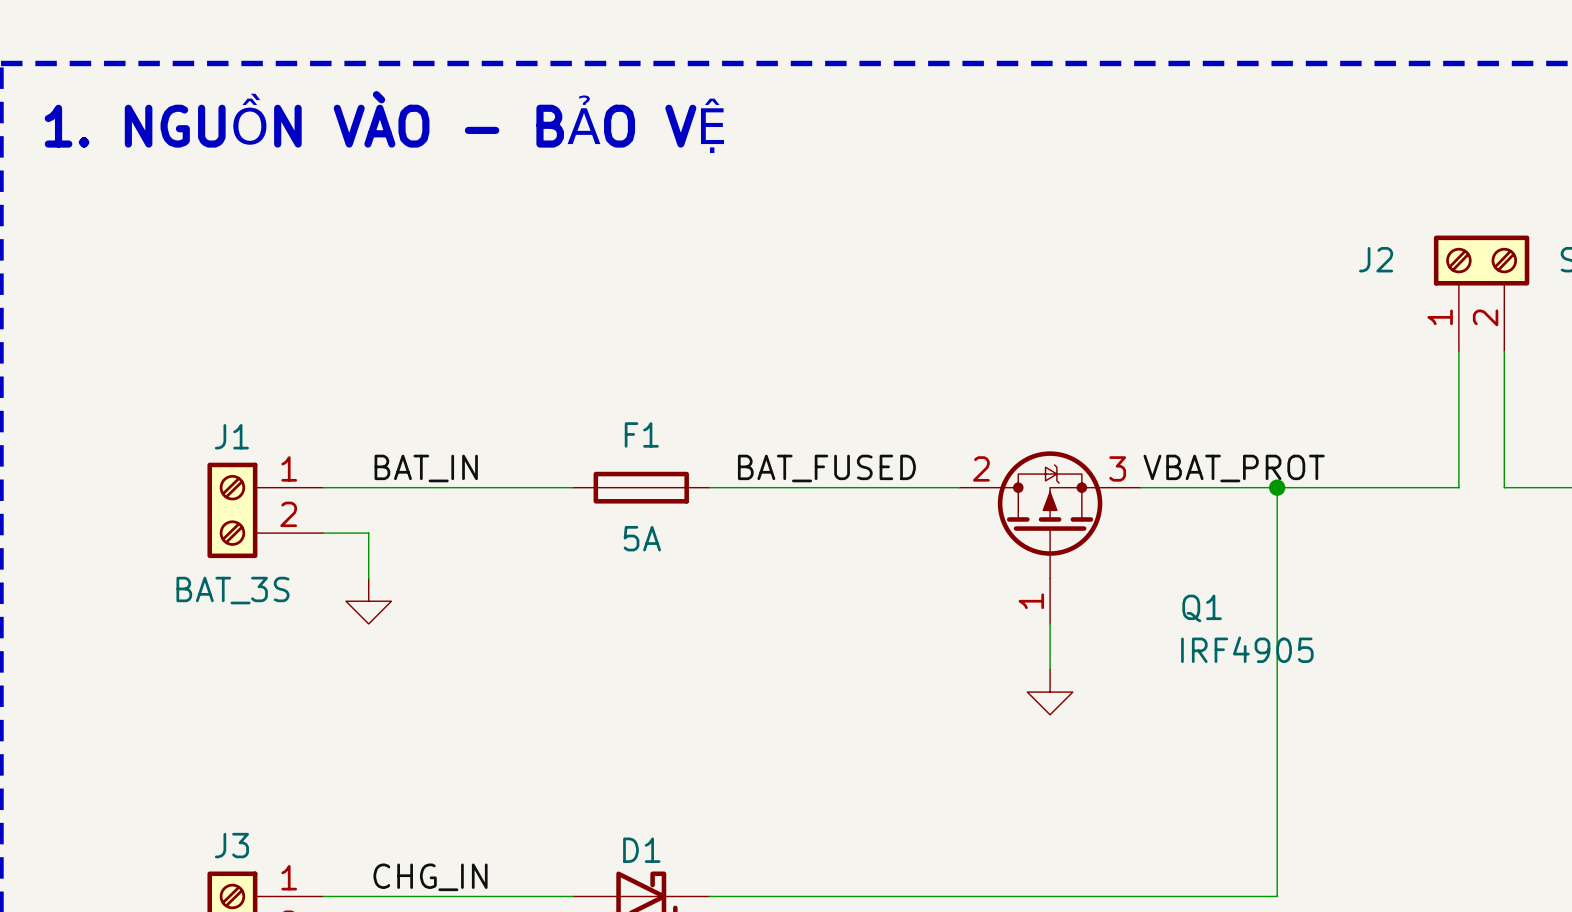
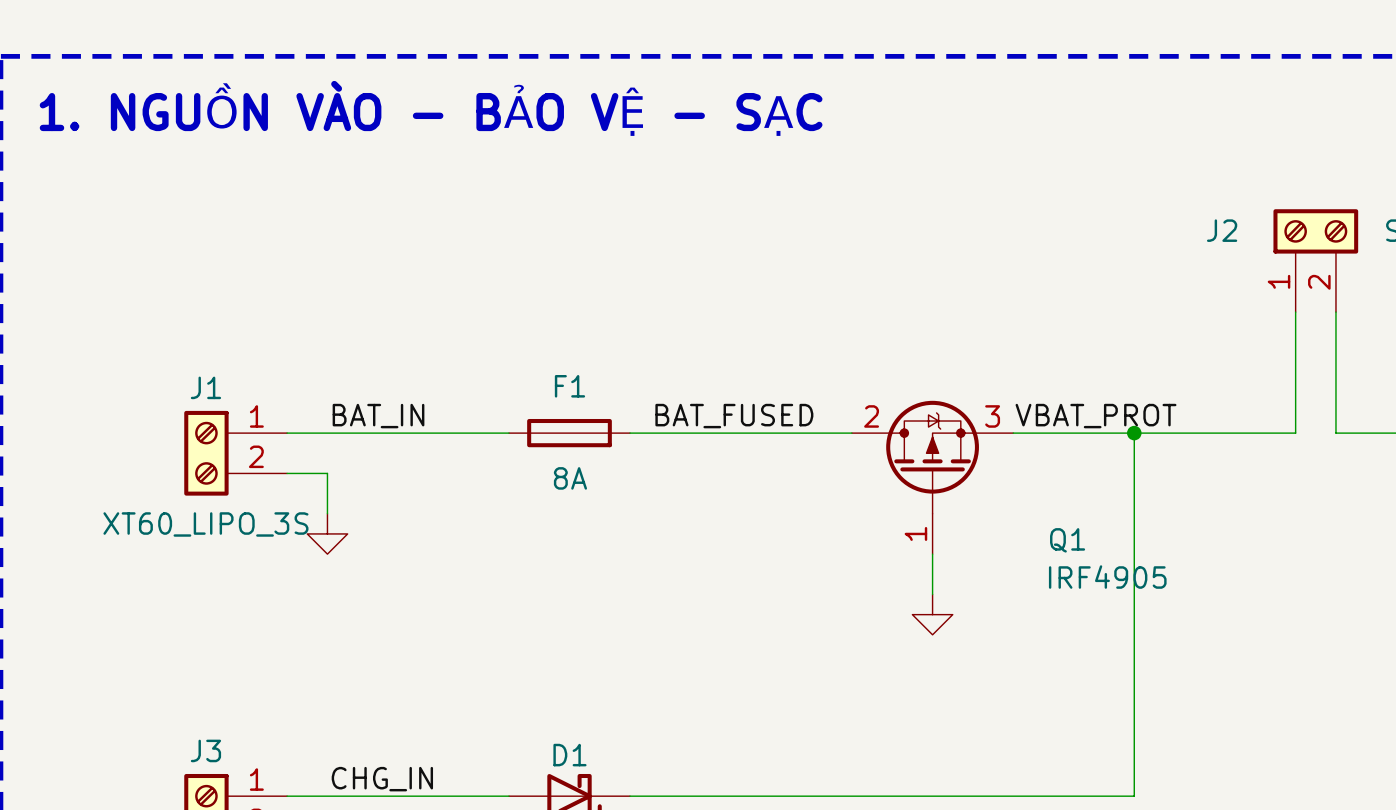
text: 1. NGUỒN VÀO - BẢO VỆ (386, 123) -> 1. NGUỒN VÀO - BẢO VỆ - SẠC (431, 109)
F1 value: 5A (642, 538) -> 8A (570, 478)
J1 value: BAT_3S (232, 590) -> XT60_LIPO_3S (205, 524)

